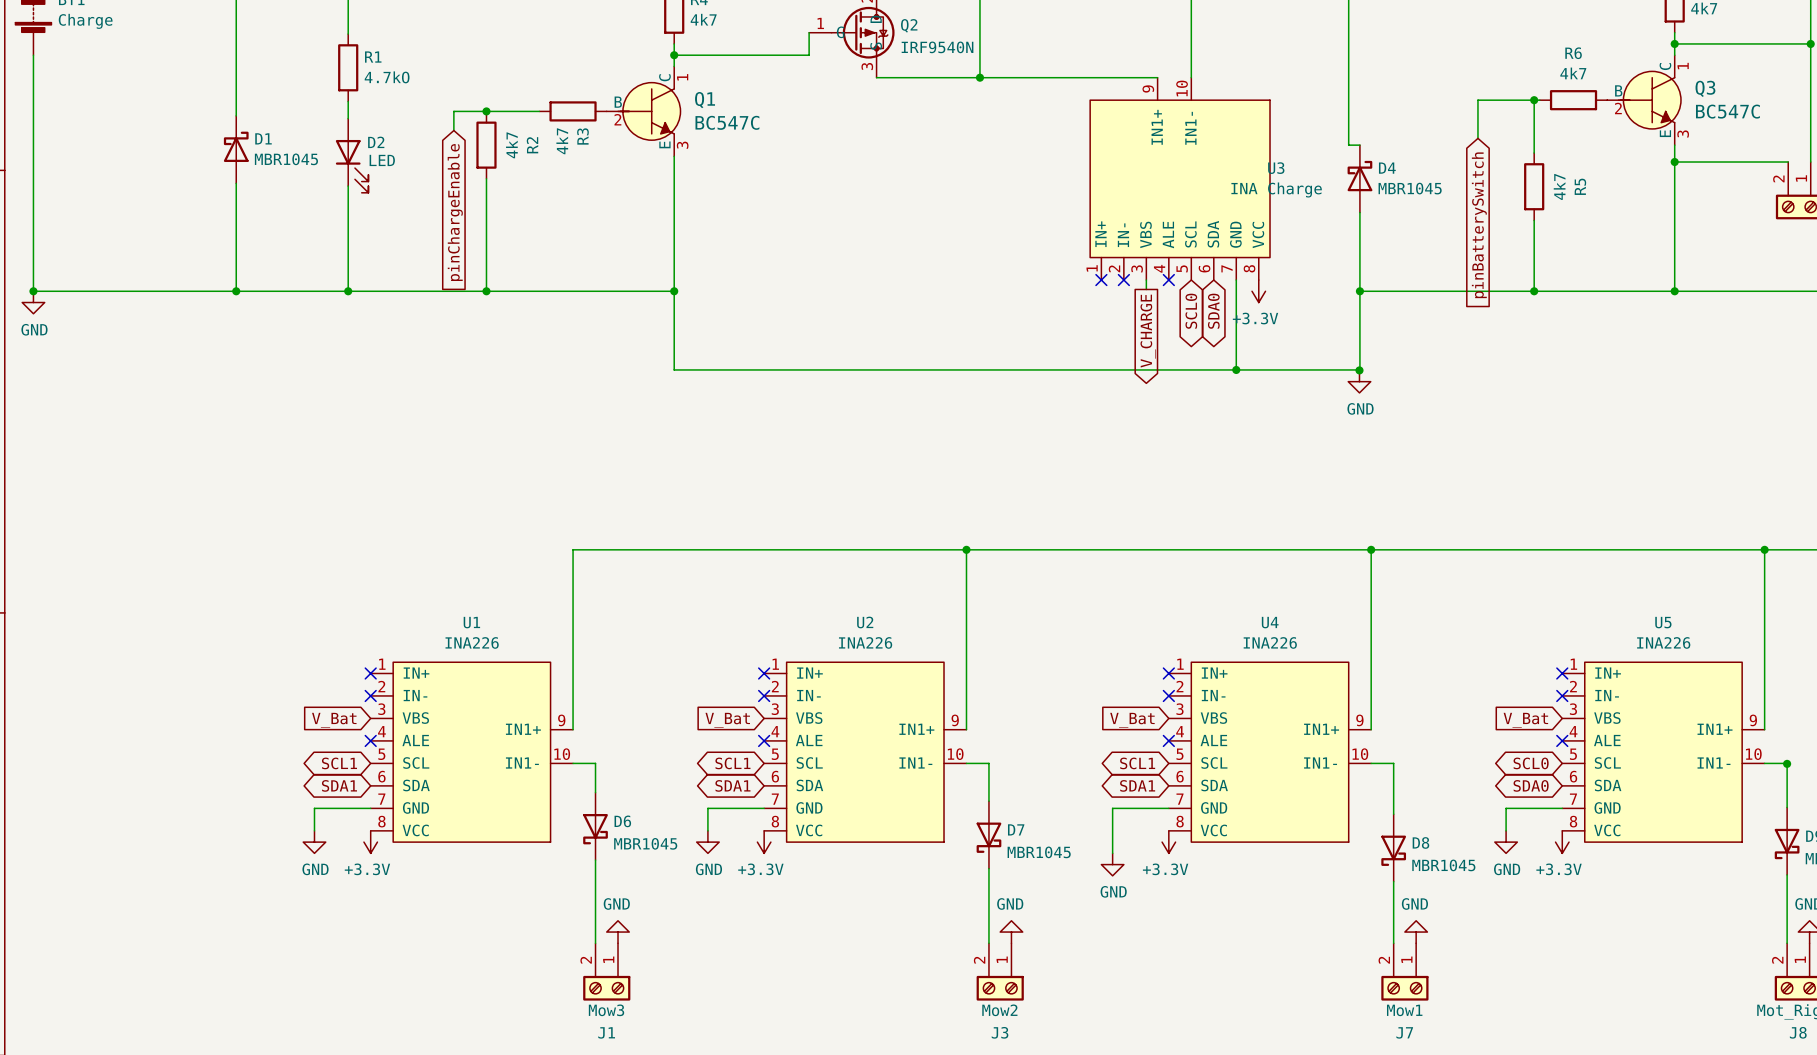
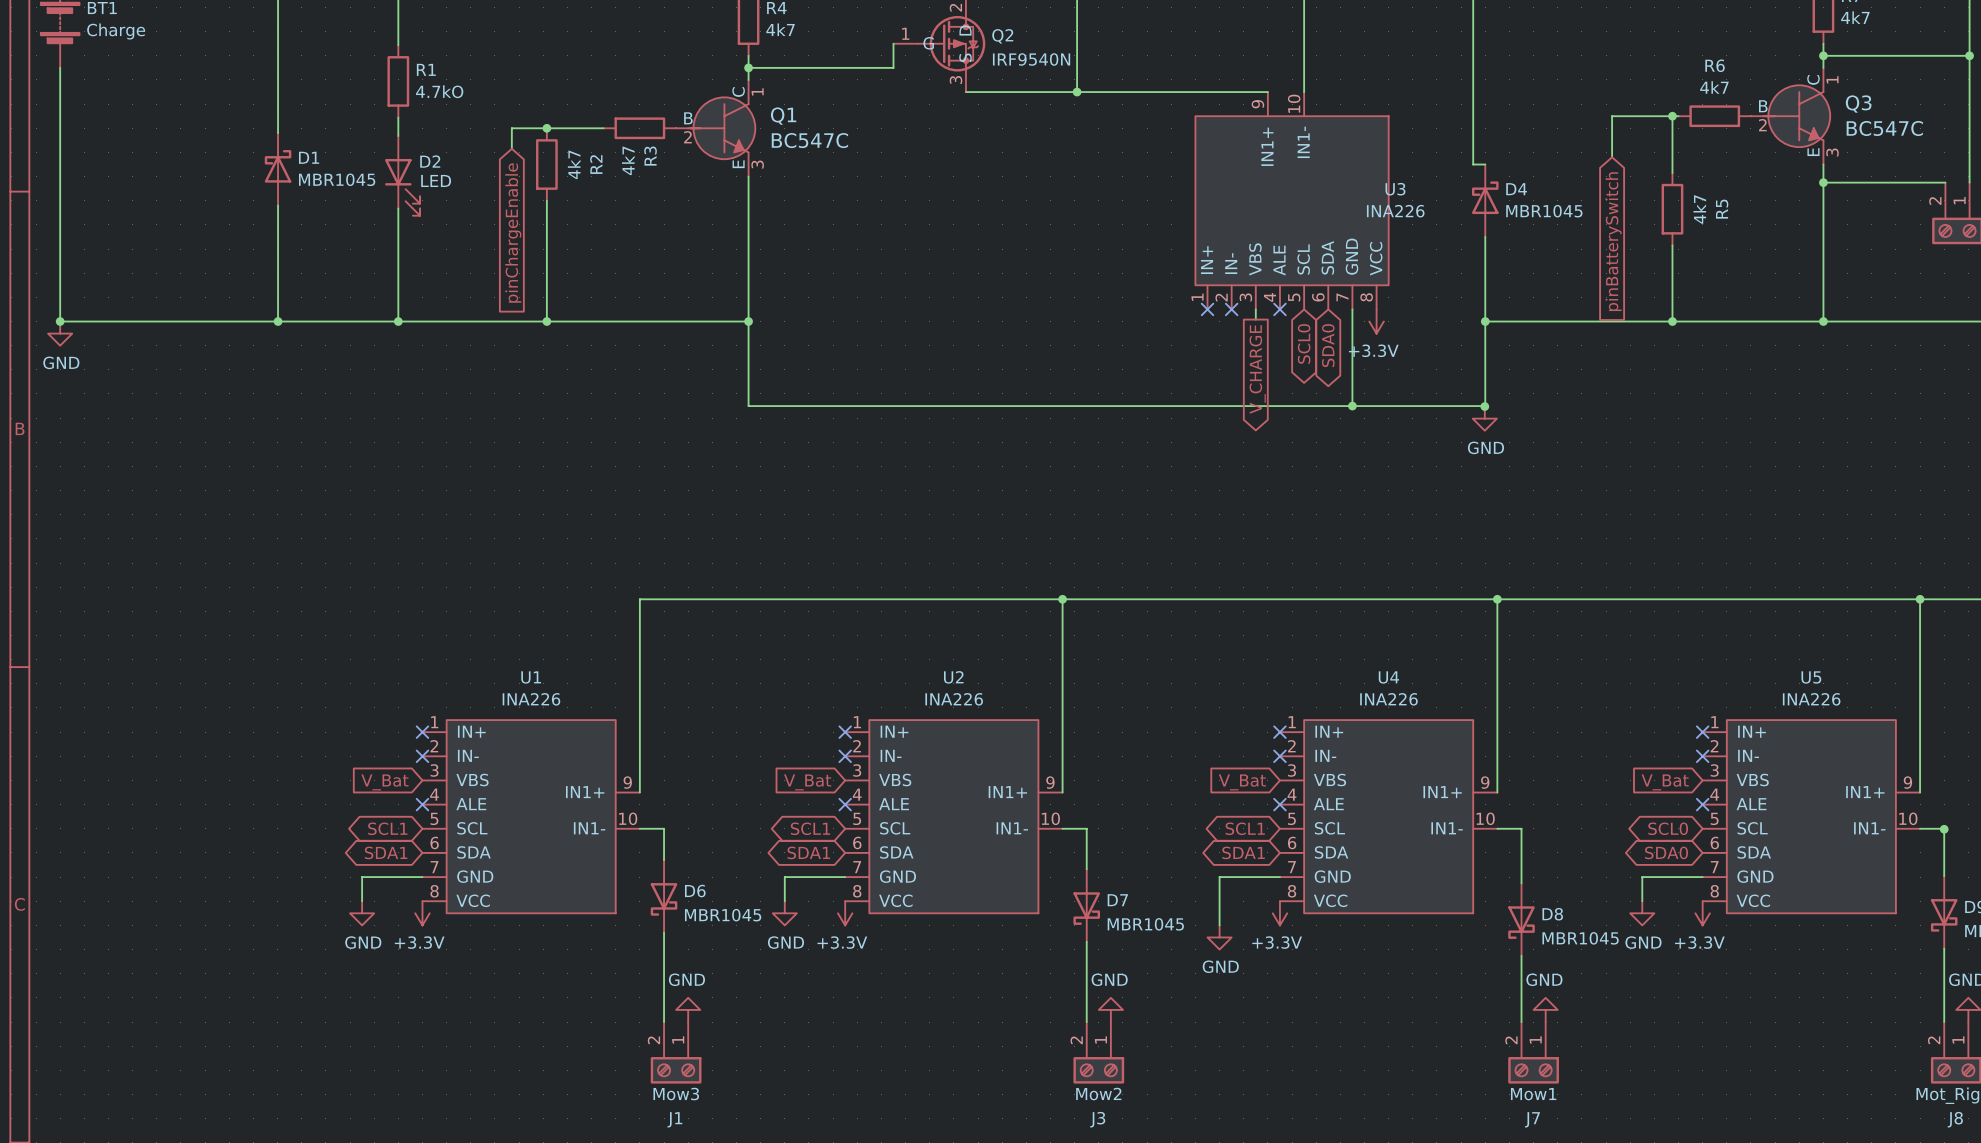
U3 value: INA Charge (1276, 189) -> INA226 (1395, 211)

